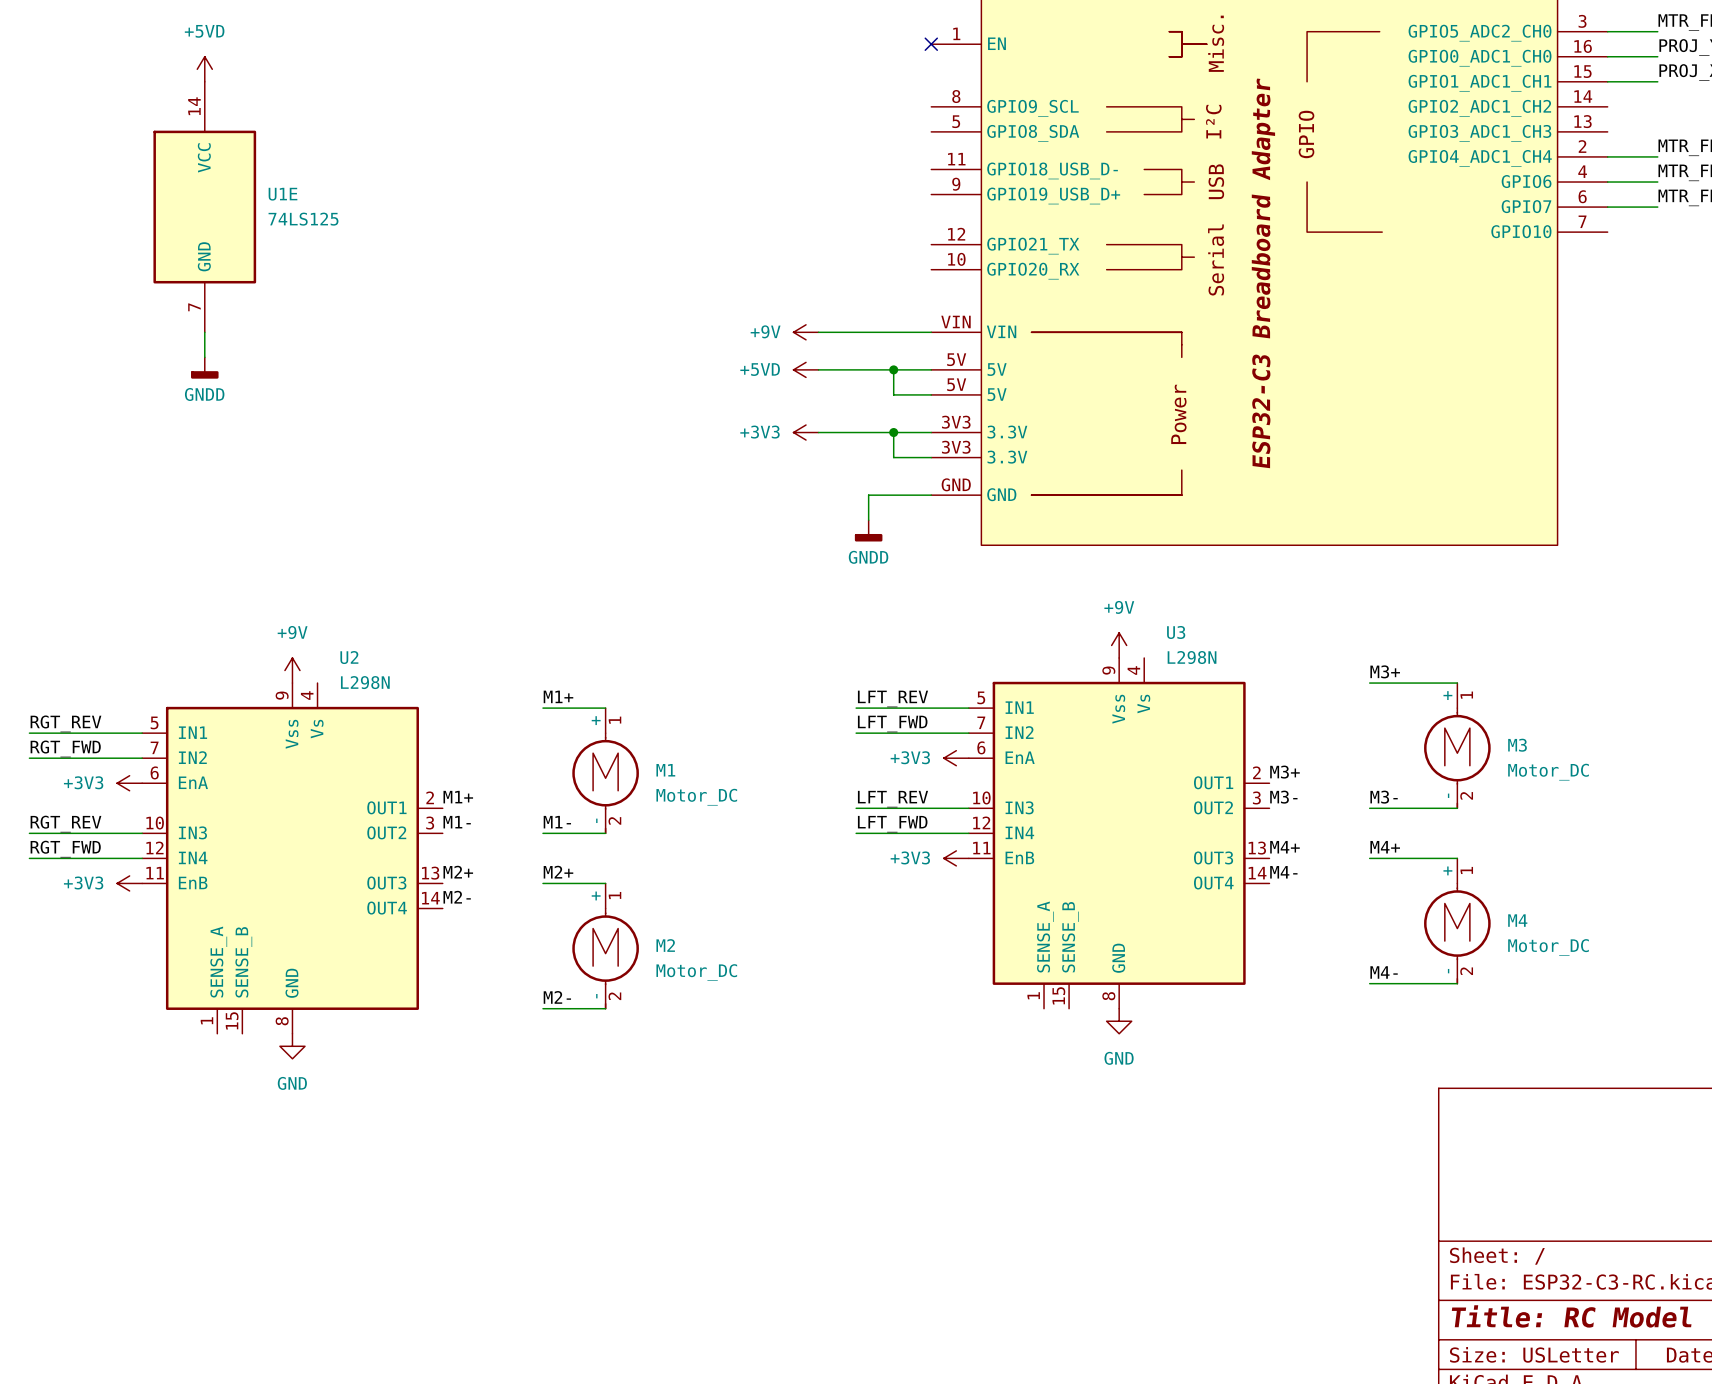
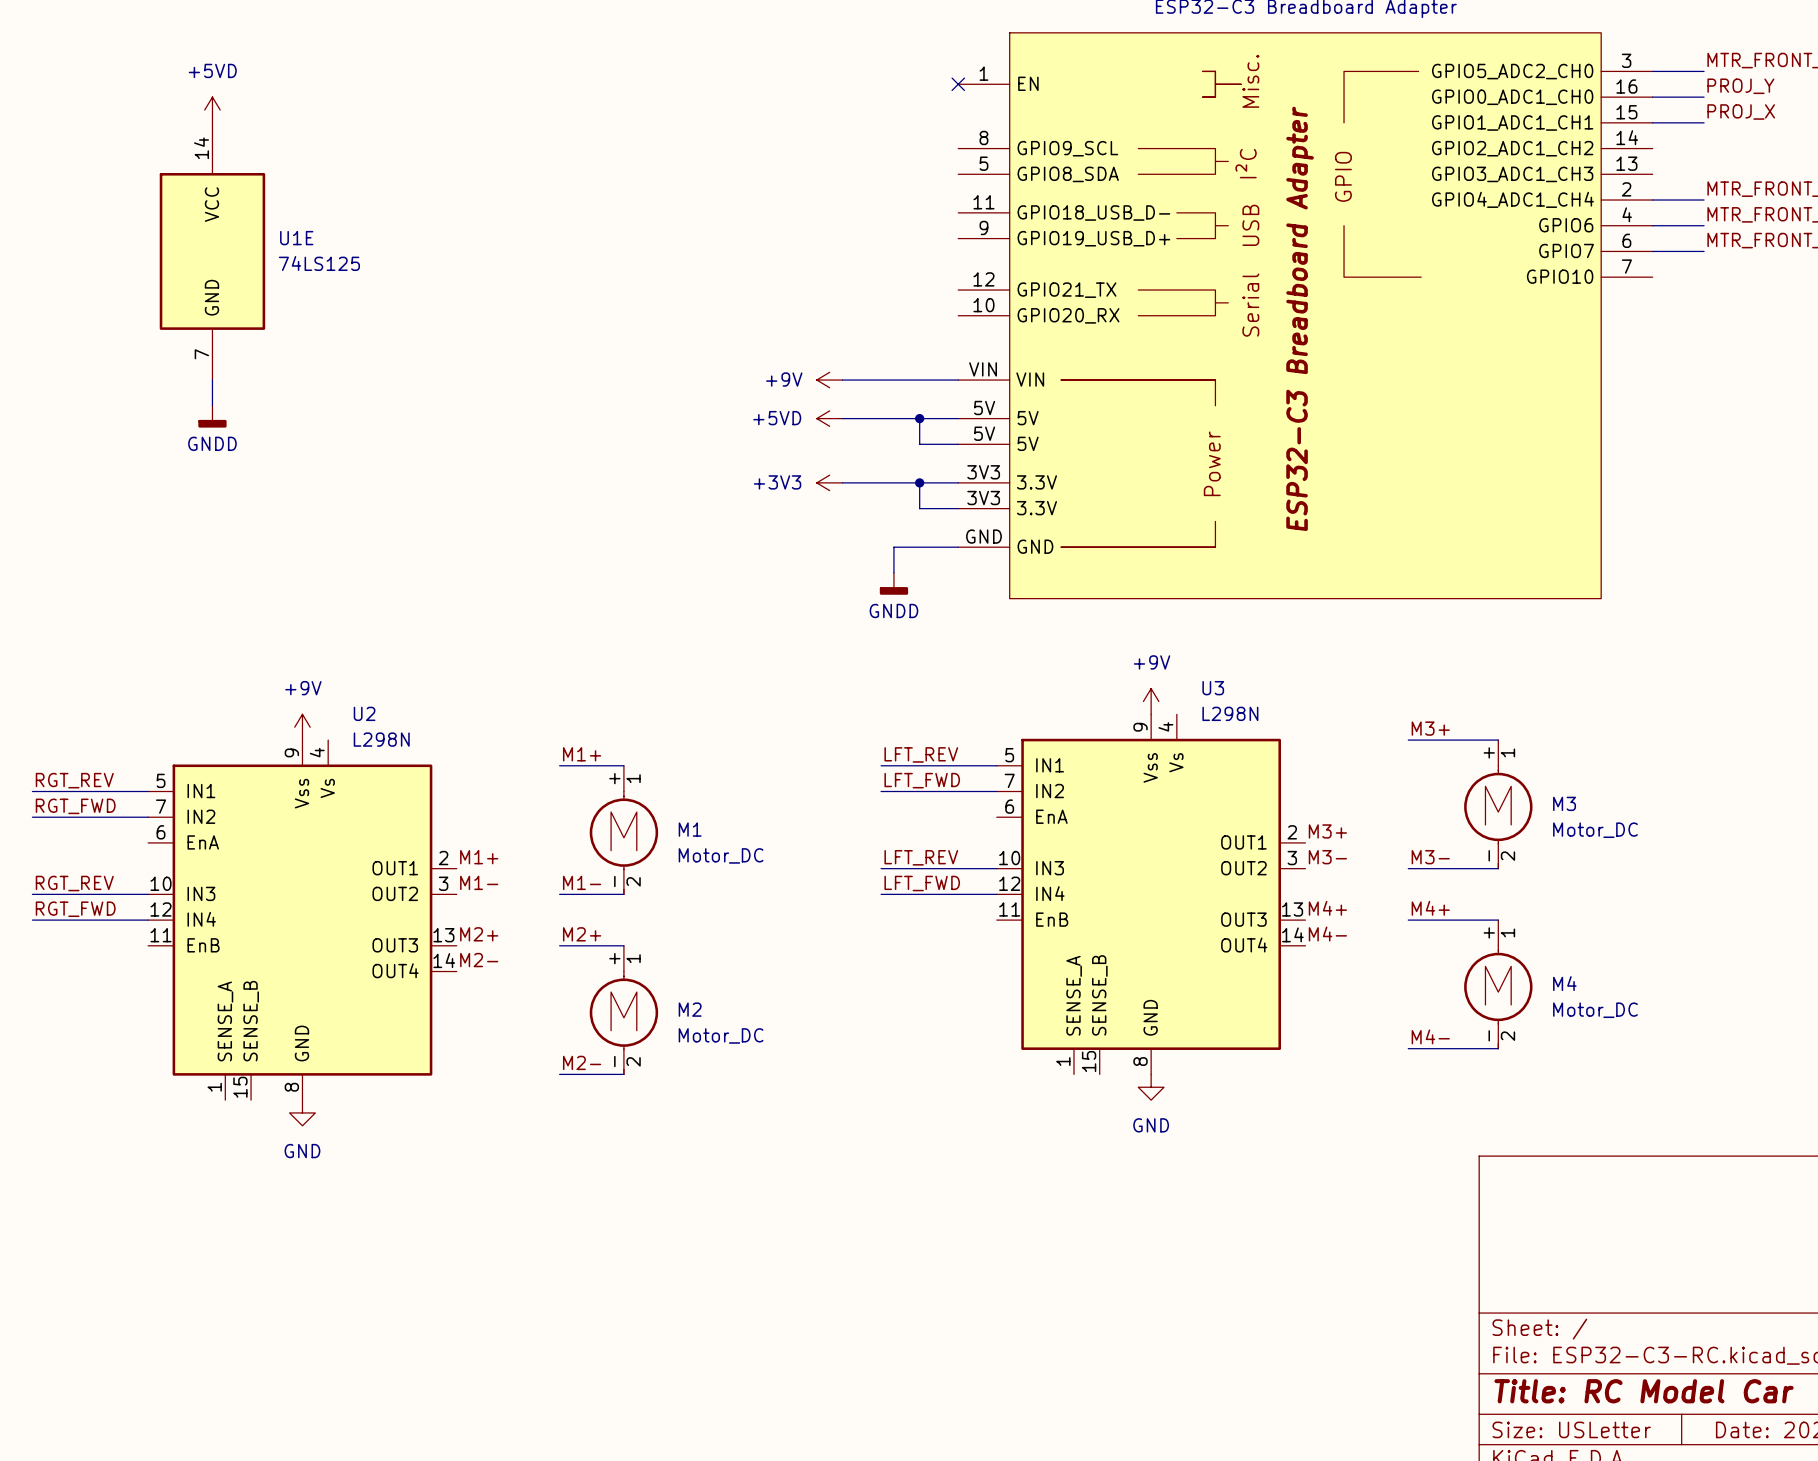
power symbol: +3V3 (956, 758) -> none
power symbol: +3V3 (129, 783) -> none
power symbol: +3V3 (956, 858) -> none
power symbol: +3V3 (129, 883) -> none

